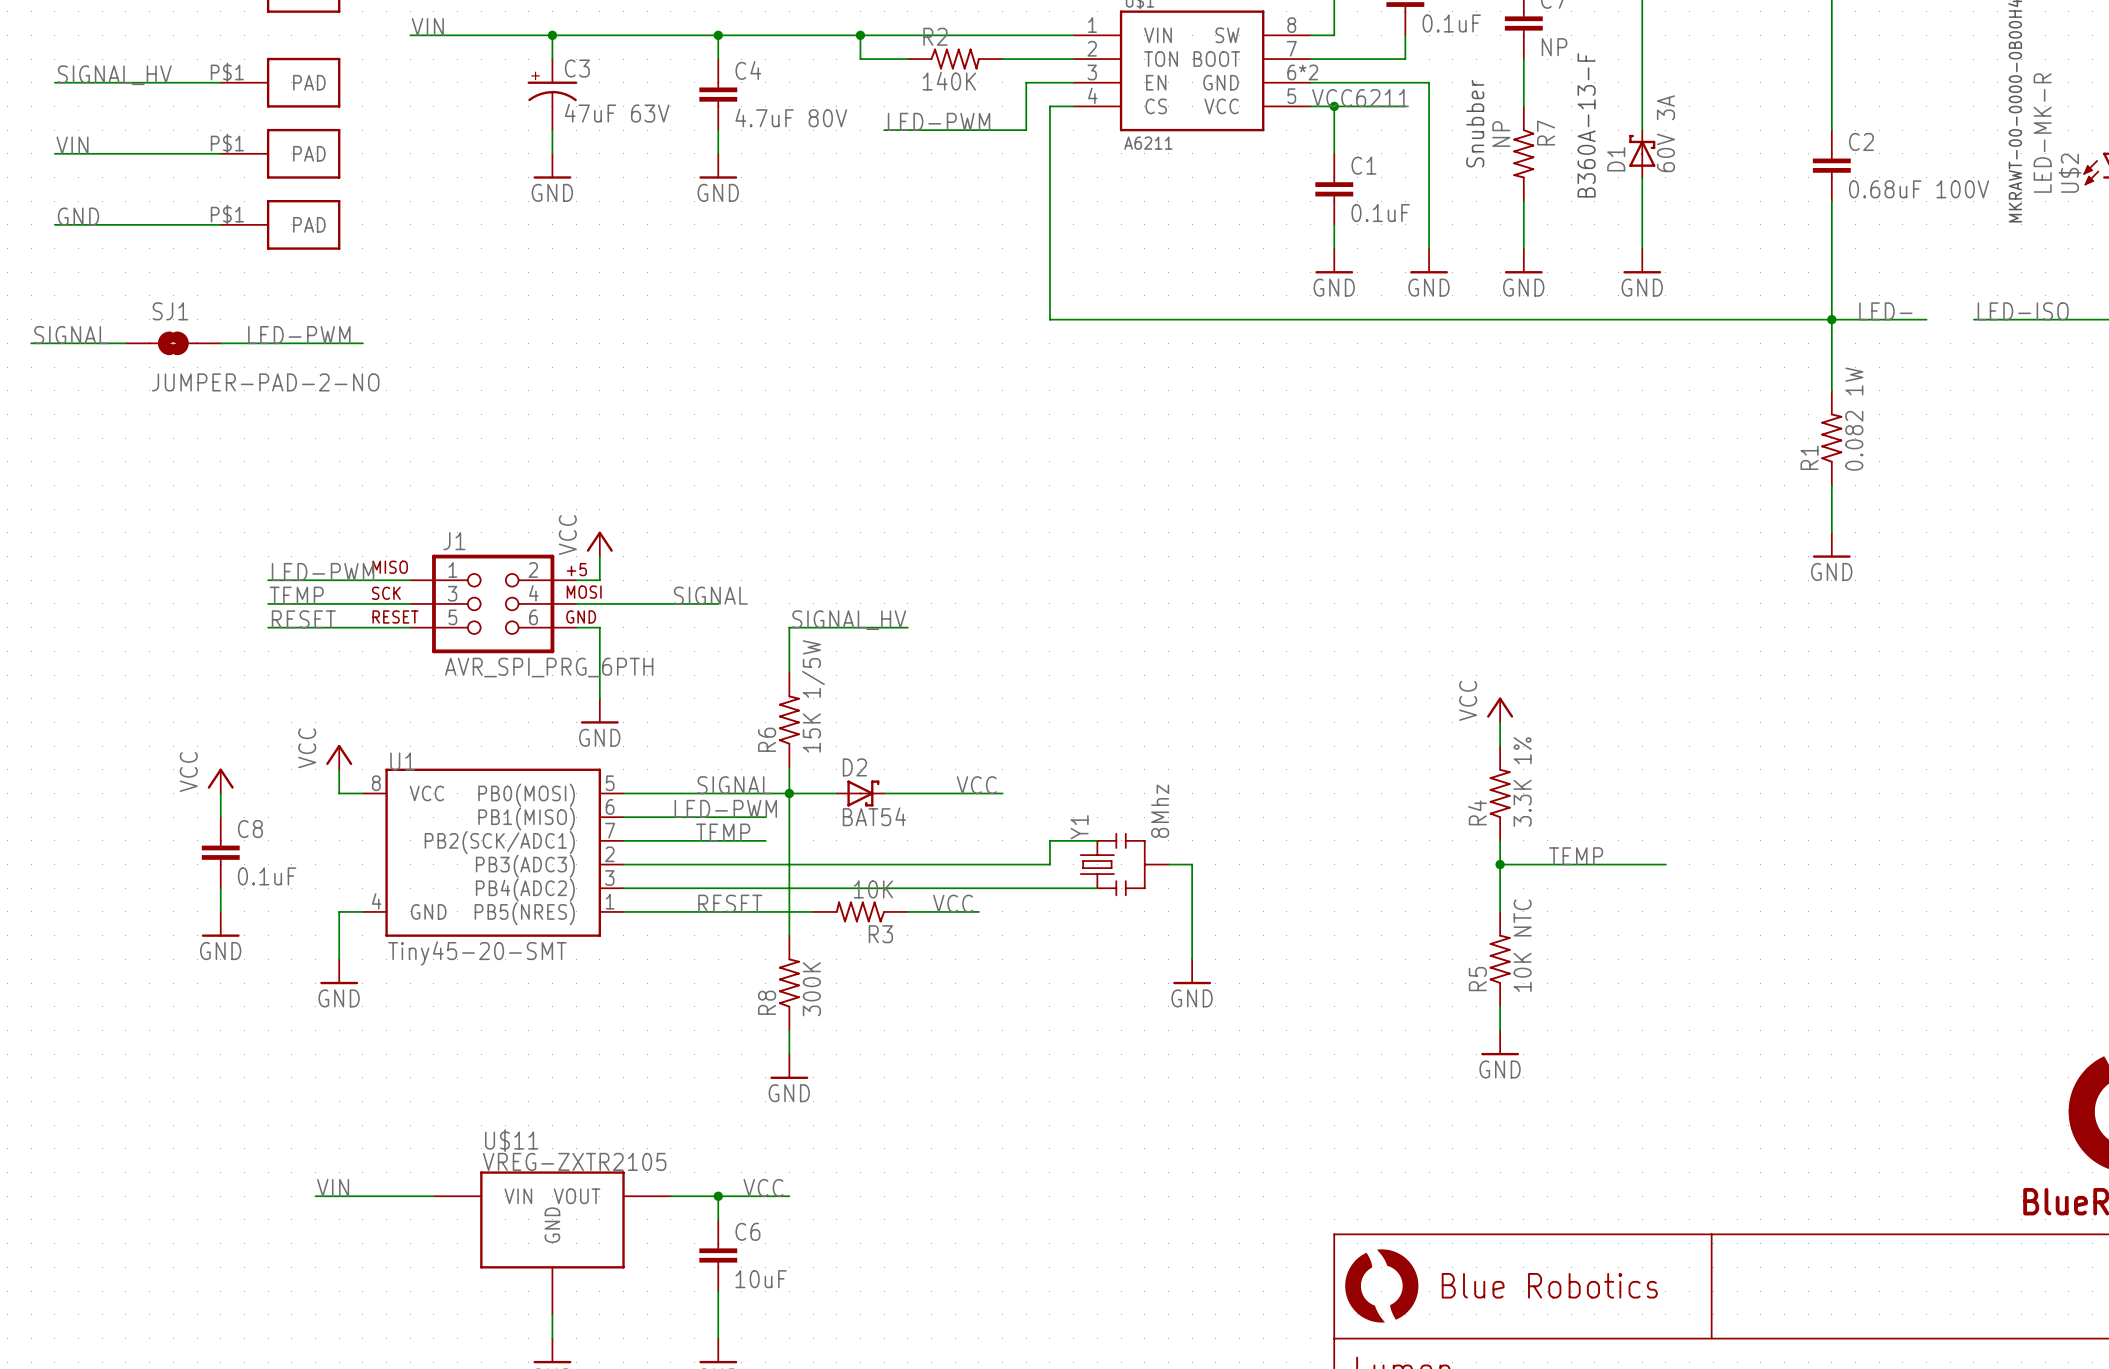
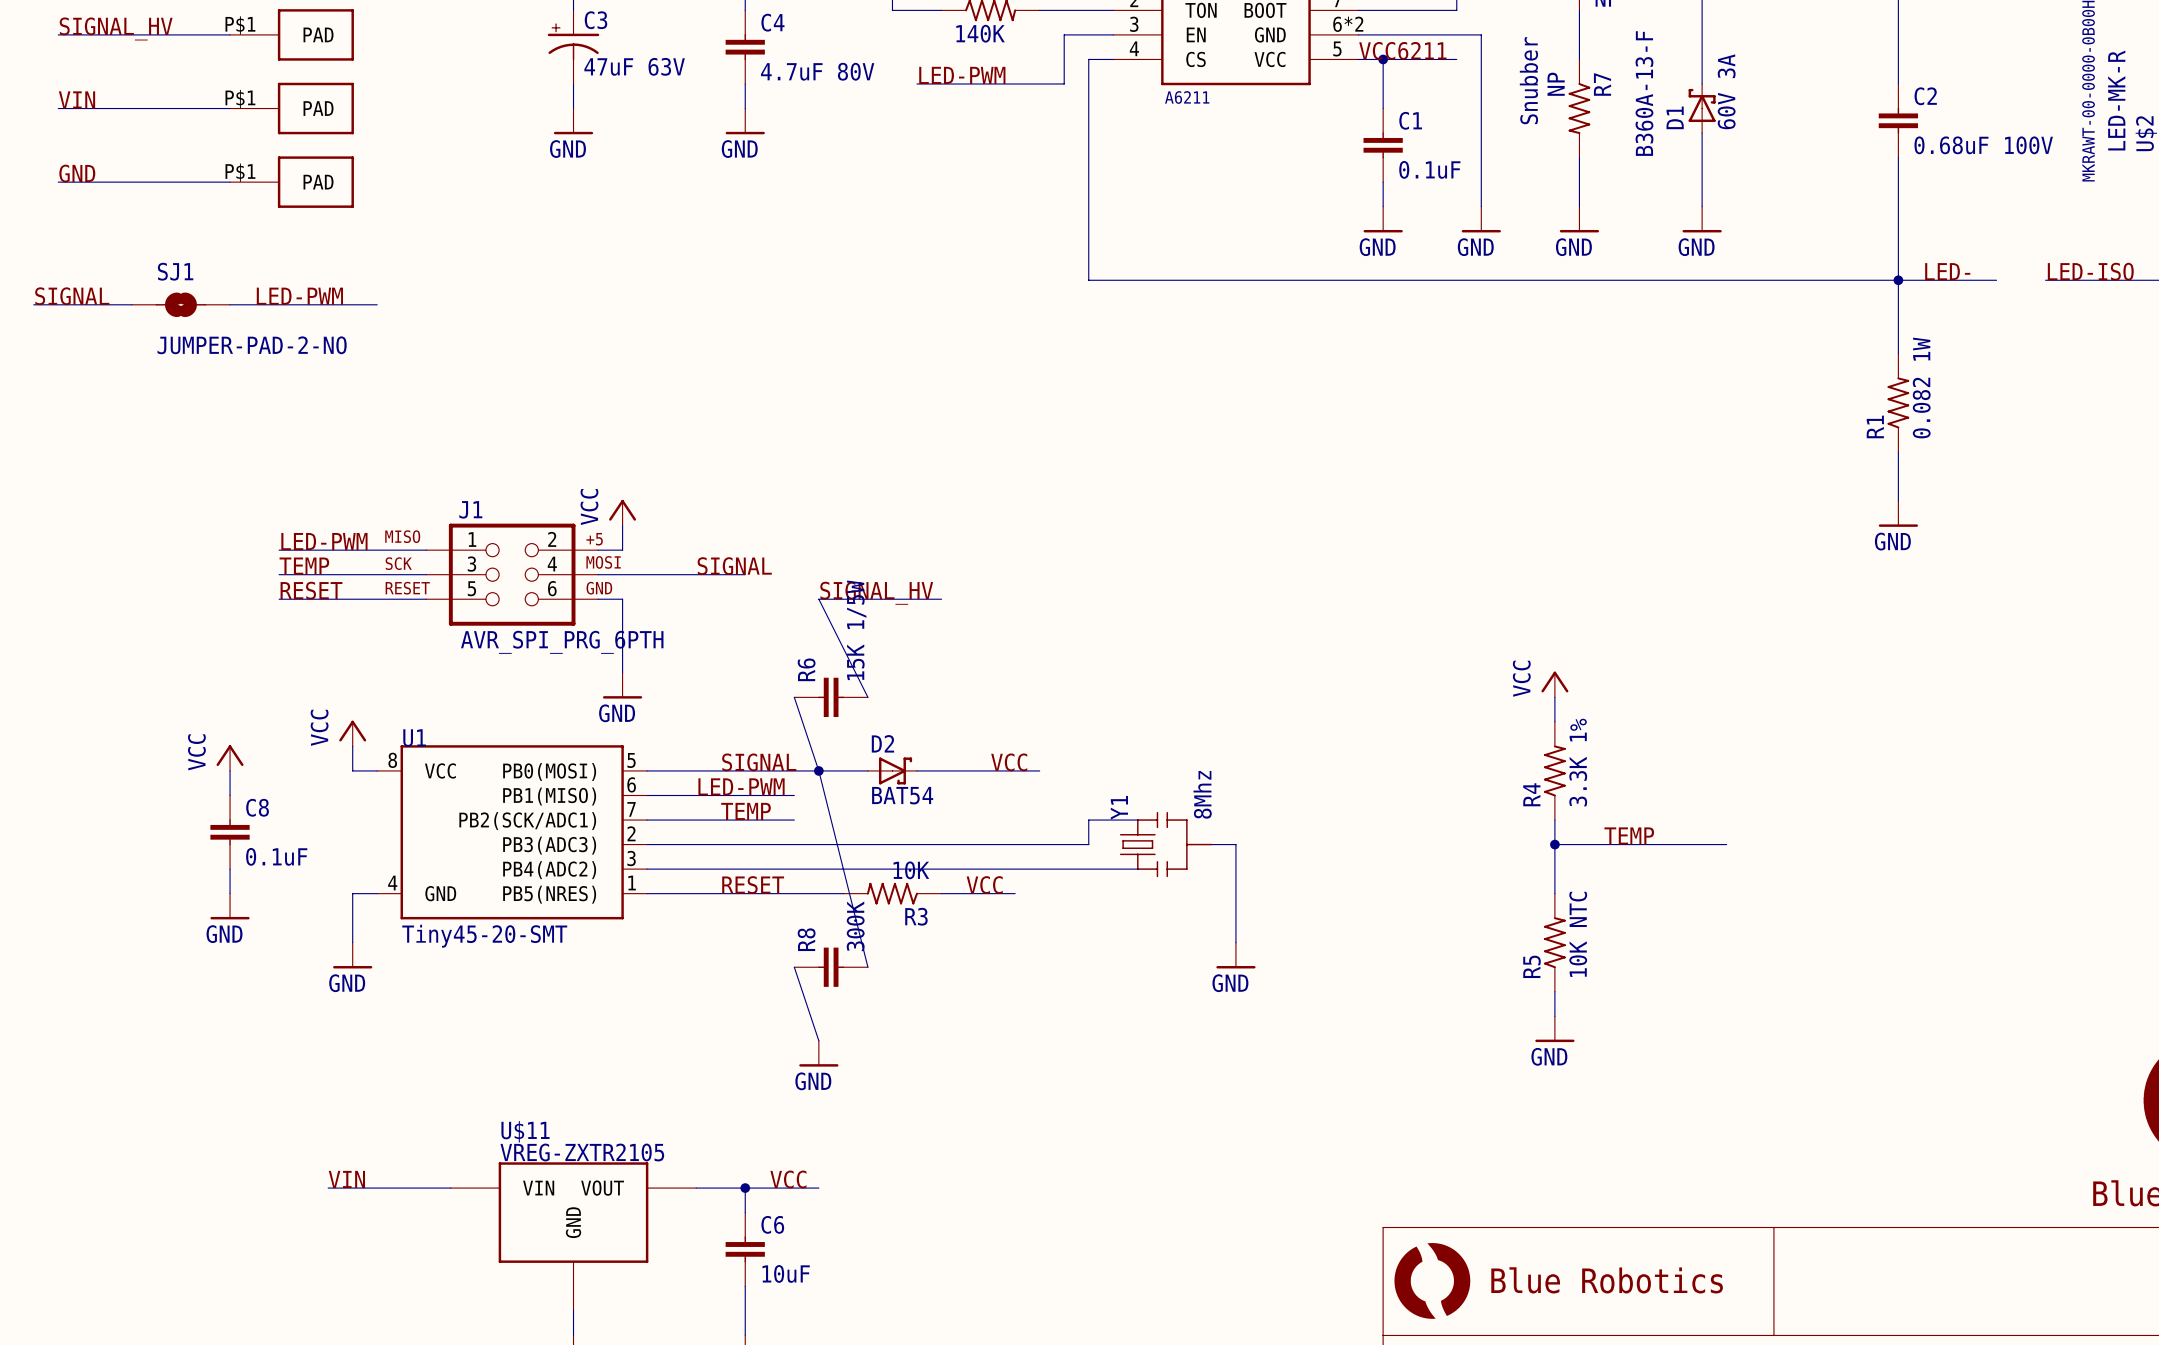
wire: (789, 627) (789, 672) -> (818, 599) (867, 697)
R6 symbol: [778, 672, 800, 768] -> [794, 677, 868, 717]
R6 value position: 15K 1/5W (813, 696) -> 15K 1/5W (856, 630)
wire: none -> (794, 697) (818, 770) (867, 967)
R6 name position: R6 (767, 739) -> R6 (806, 669)
wire: (789, 767) (789, 935) -> none
R8 symbol: [778, 935, 800, 1031] -> [794, 947, 868, 987]
R8 value position: 300K (811, 989) -> 300K (855, 926)
R8 name position: R8 (767, 1002) -> R8 (806, 939)
wire: (789, 1030) (789, 1054) -> (794, 967) (818, 1040)

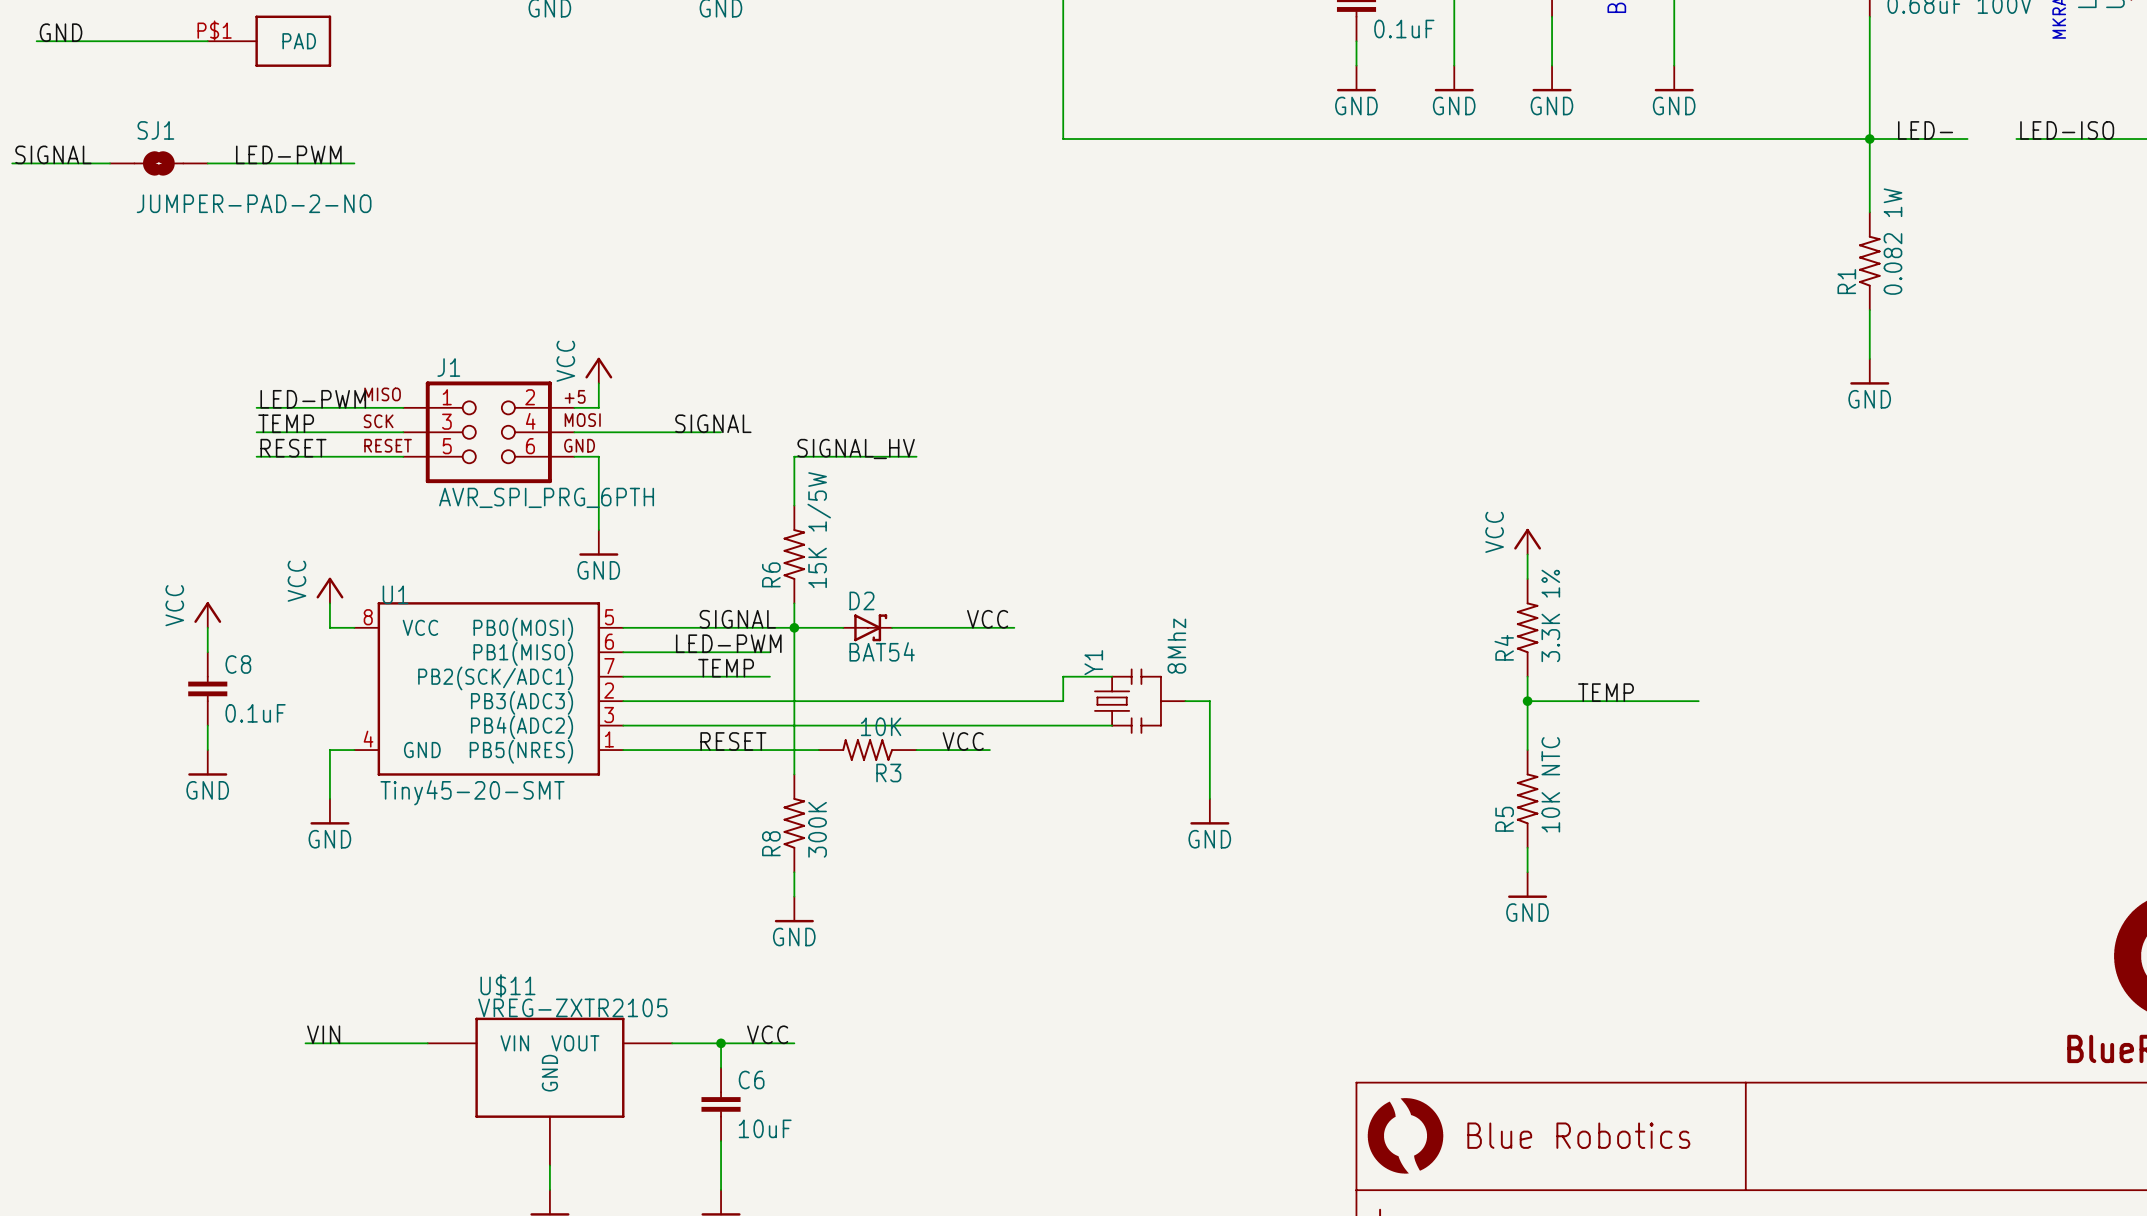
wire: (818, 599) (867, 697) -> (794, 456) (794, 505)
R6 value position: 15K 1/5W (856, 630) -> 15K 1/5W (819, 530)
R6 name position: R6 (806, 669) -> R6 (771, 574)
R6 symbol: [794, 677, 868, 717] -> [783, 505, 806, 604]
wire: (794, 697) (818, 770) (867, 967) -> none
wire: none -> (794, 603) (794, 774)
R8 value position: 300K (855, 926) -> 300K (817, 829)
R8 name position: R8 (806, 939) -> R8 (771, 843)
R8 symbol: [794, 947, 868, 987] -> [783, 774, 806, 873]
wire: (794, 967) (818, 1040) -> (794, 872) (794, 896)

